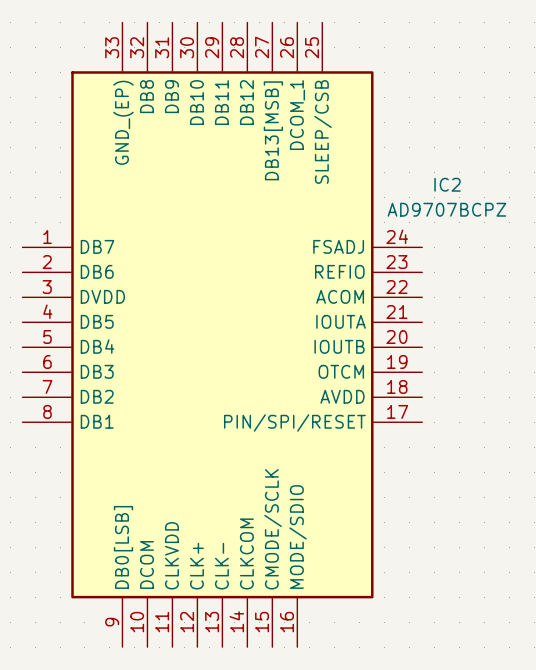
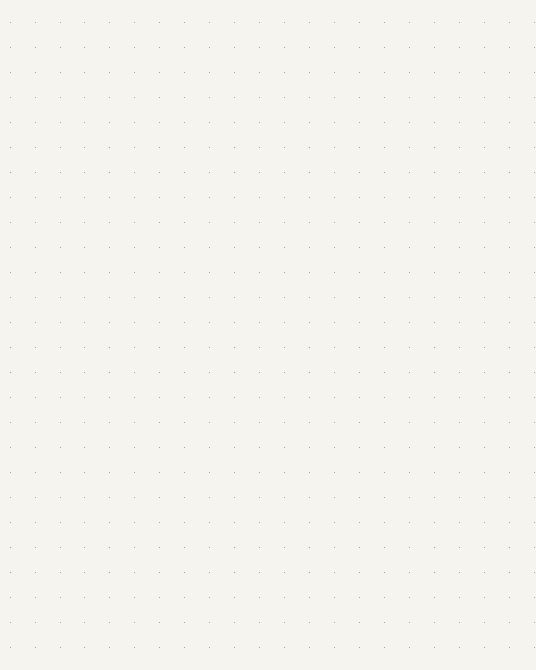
IC2: AD9707BCPZ (222, 334) -> none

